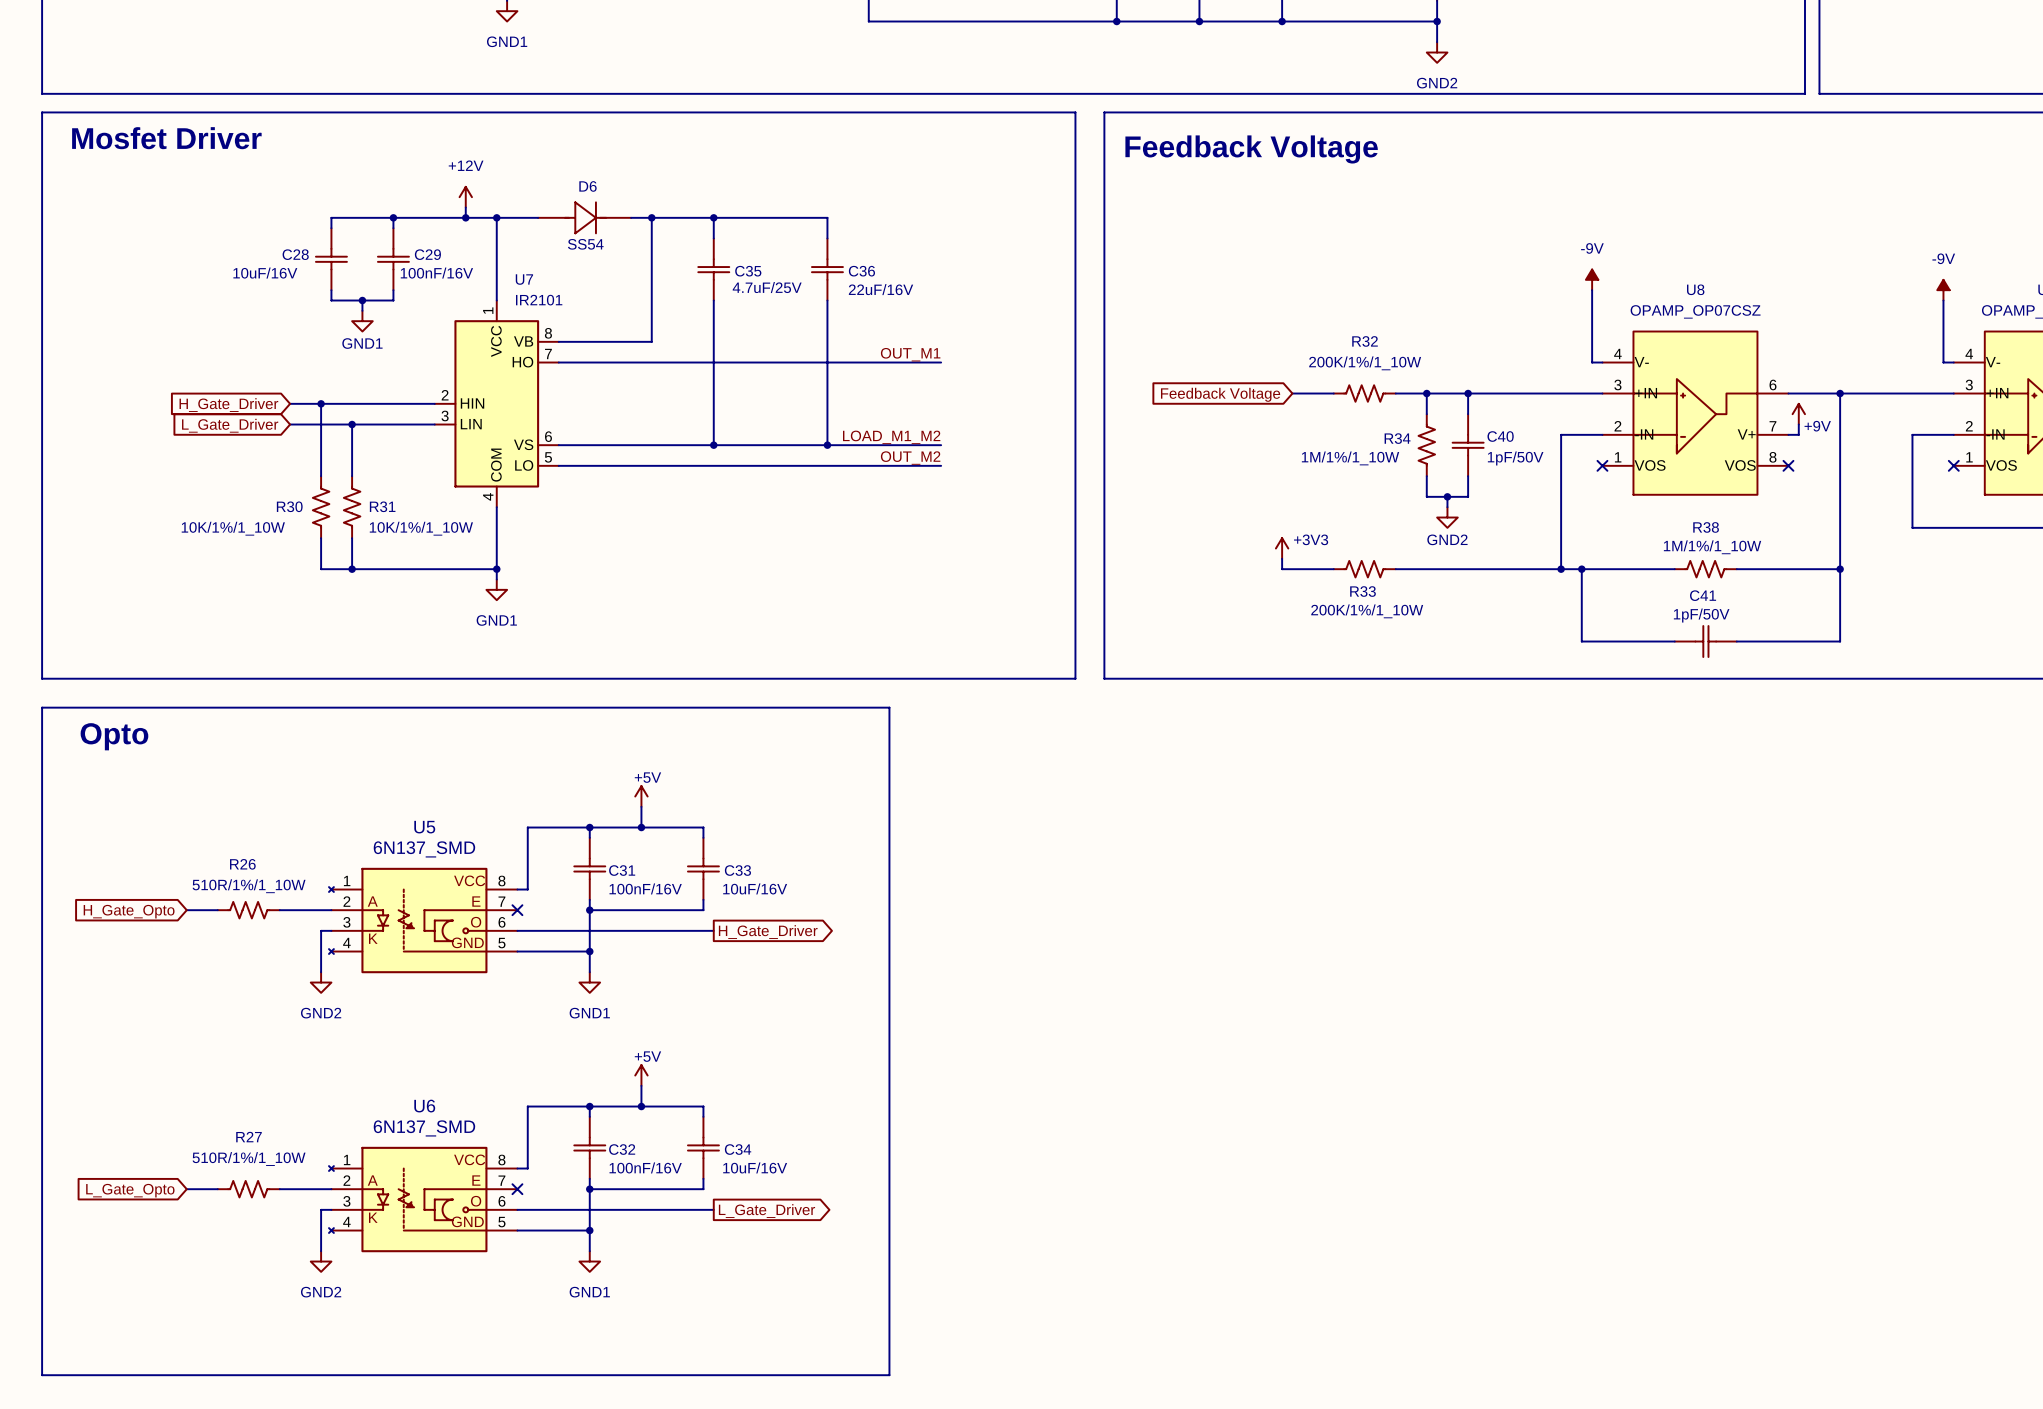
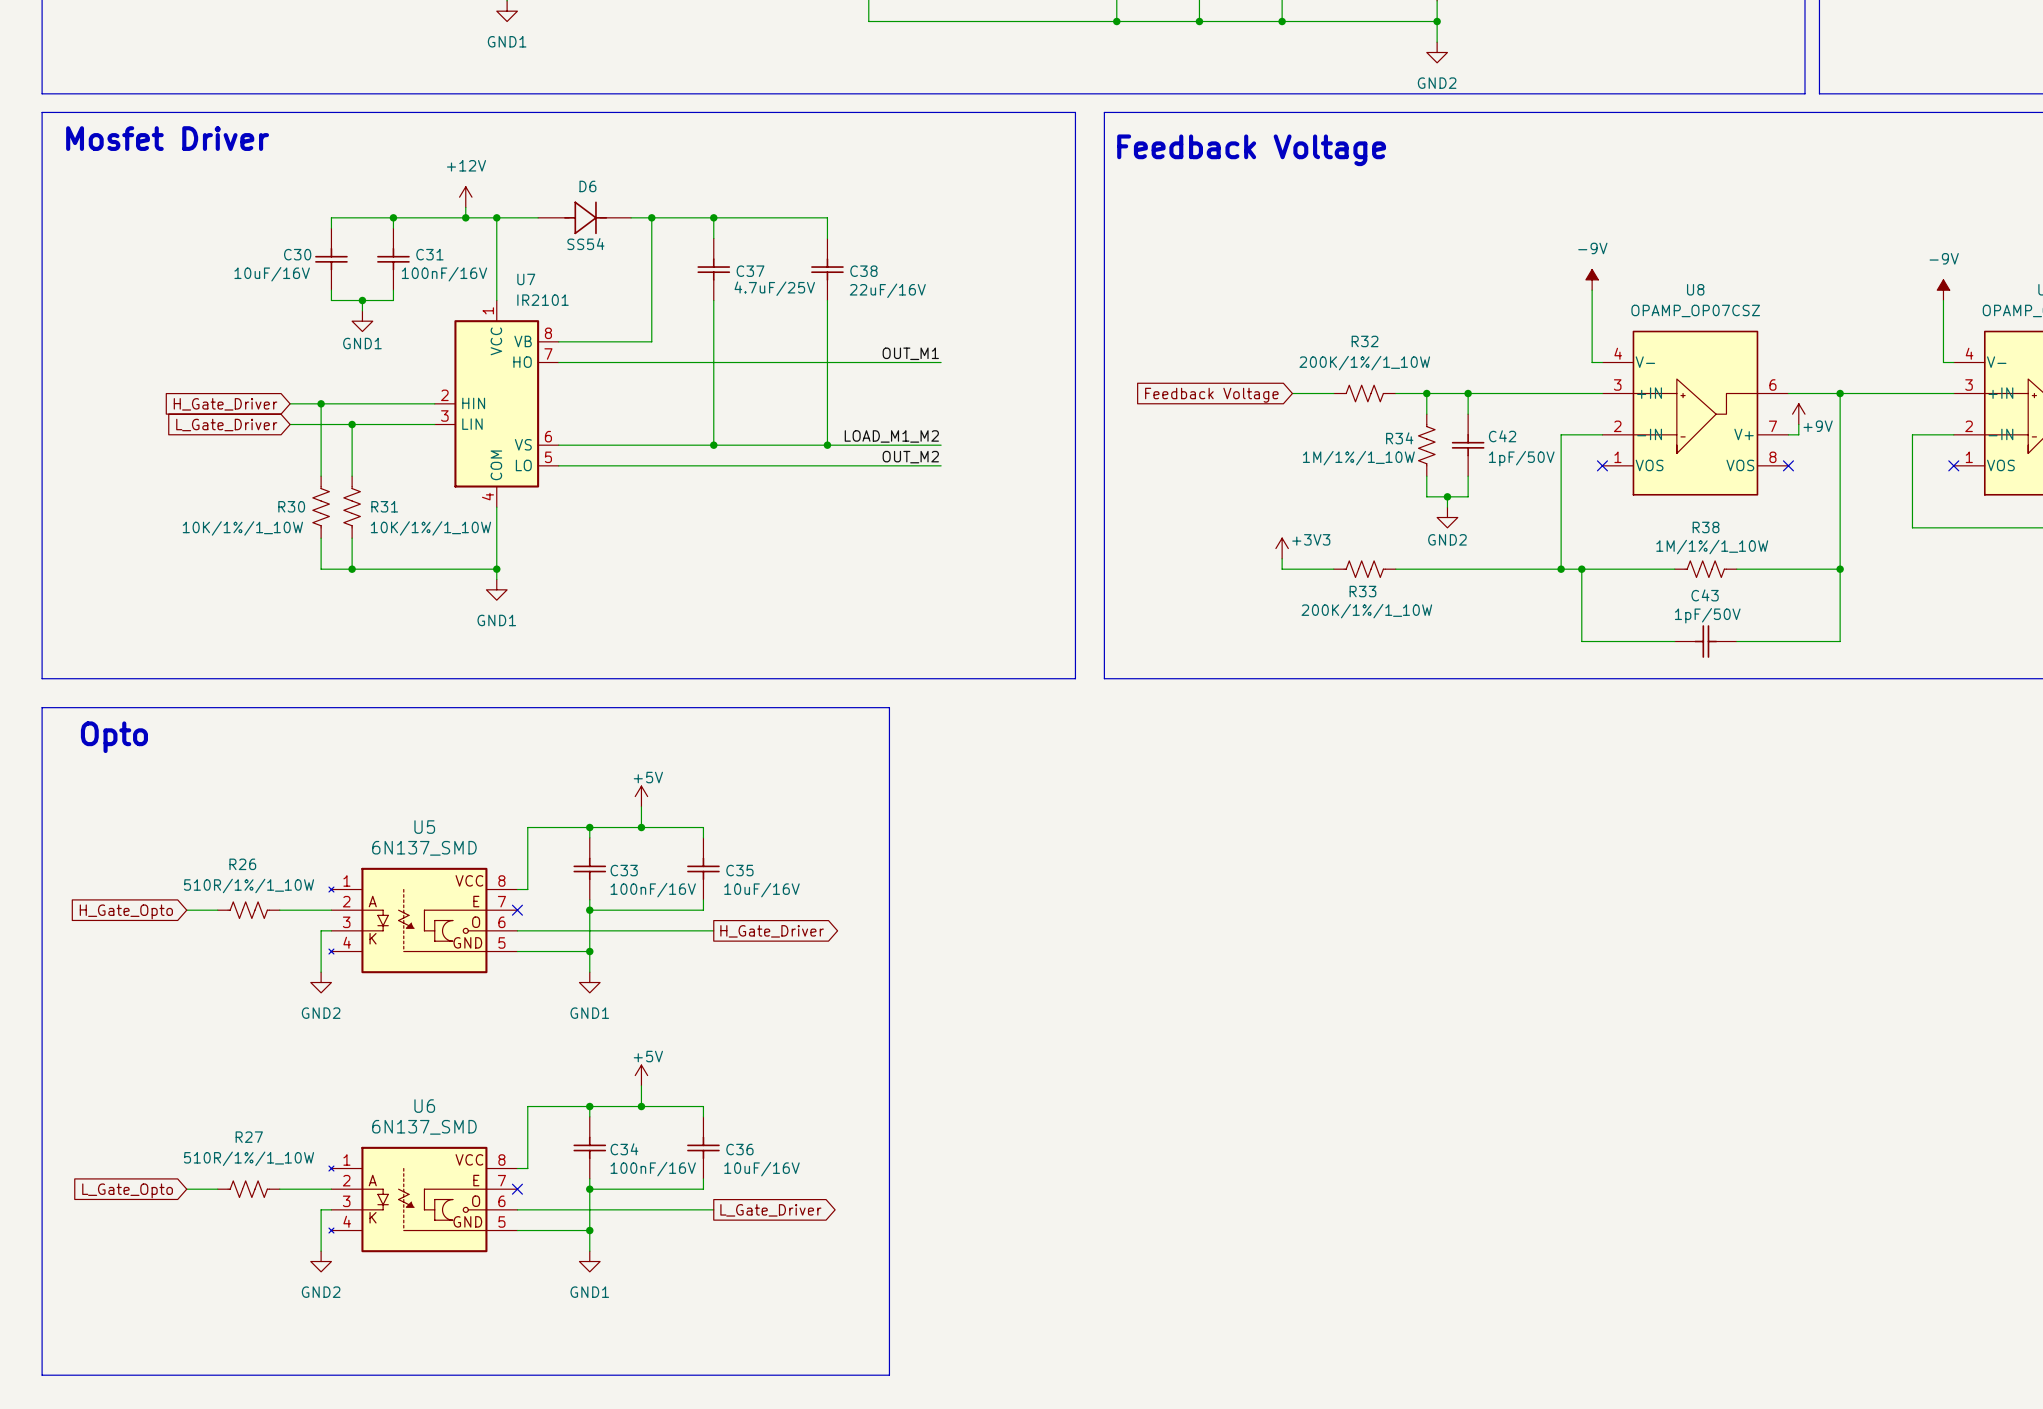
C28 name: C28 (295, 254) -> C30 (297, 254)
C29 name: C29 (427, 254) -> C31 (429, 254)
C35 name: C35 (748, 271) -> C37 (750, 271)
C36 name: C36 (861, 271) -> C38 (863, 271)
C40 name: C40 (1500, 436) -> C42 (1502, 436)
C41 name: C41 (1703, 595) -> C43 (1705, 595)
C31 name: C31 (622, 870) -> C33 (624, 870)
C33 name: C33 (737, 870) -> C35 (739, 870)
C32 name: C32 (622, 1149) -> C34 (624, 1149)
C34 name: C34 (738, 1149) -> C36 (739, 1149)

